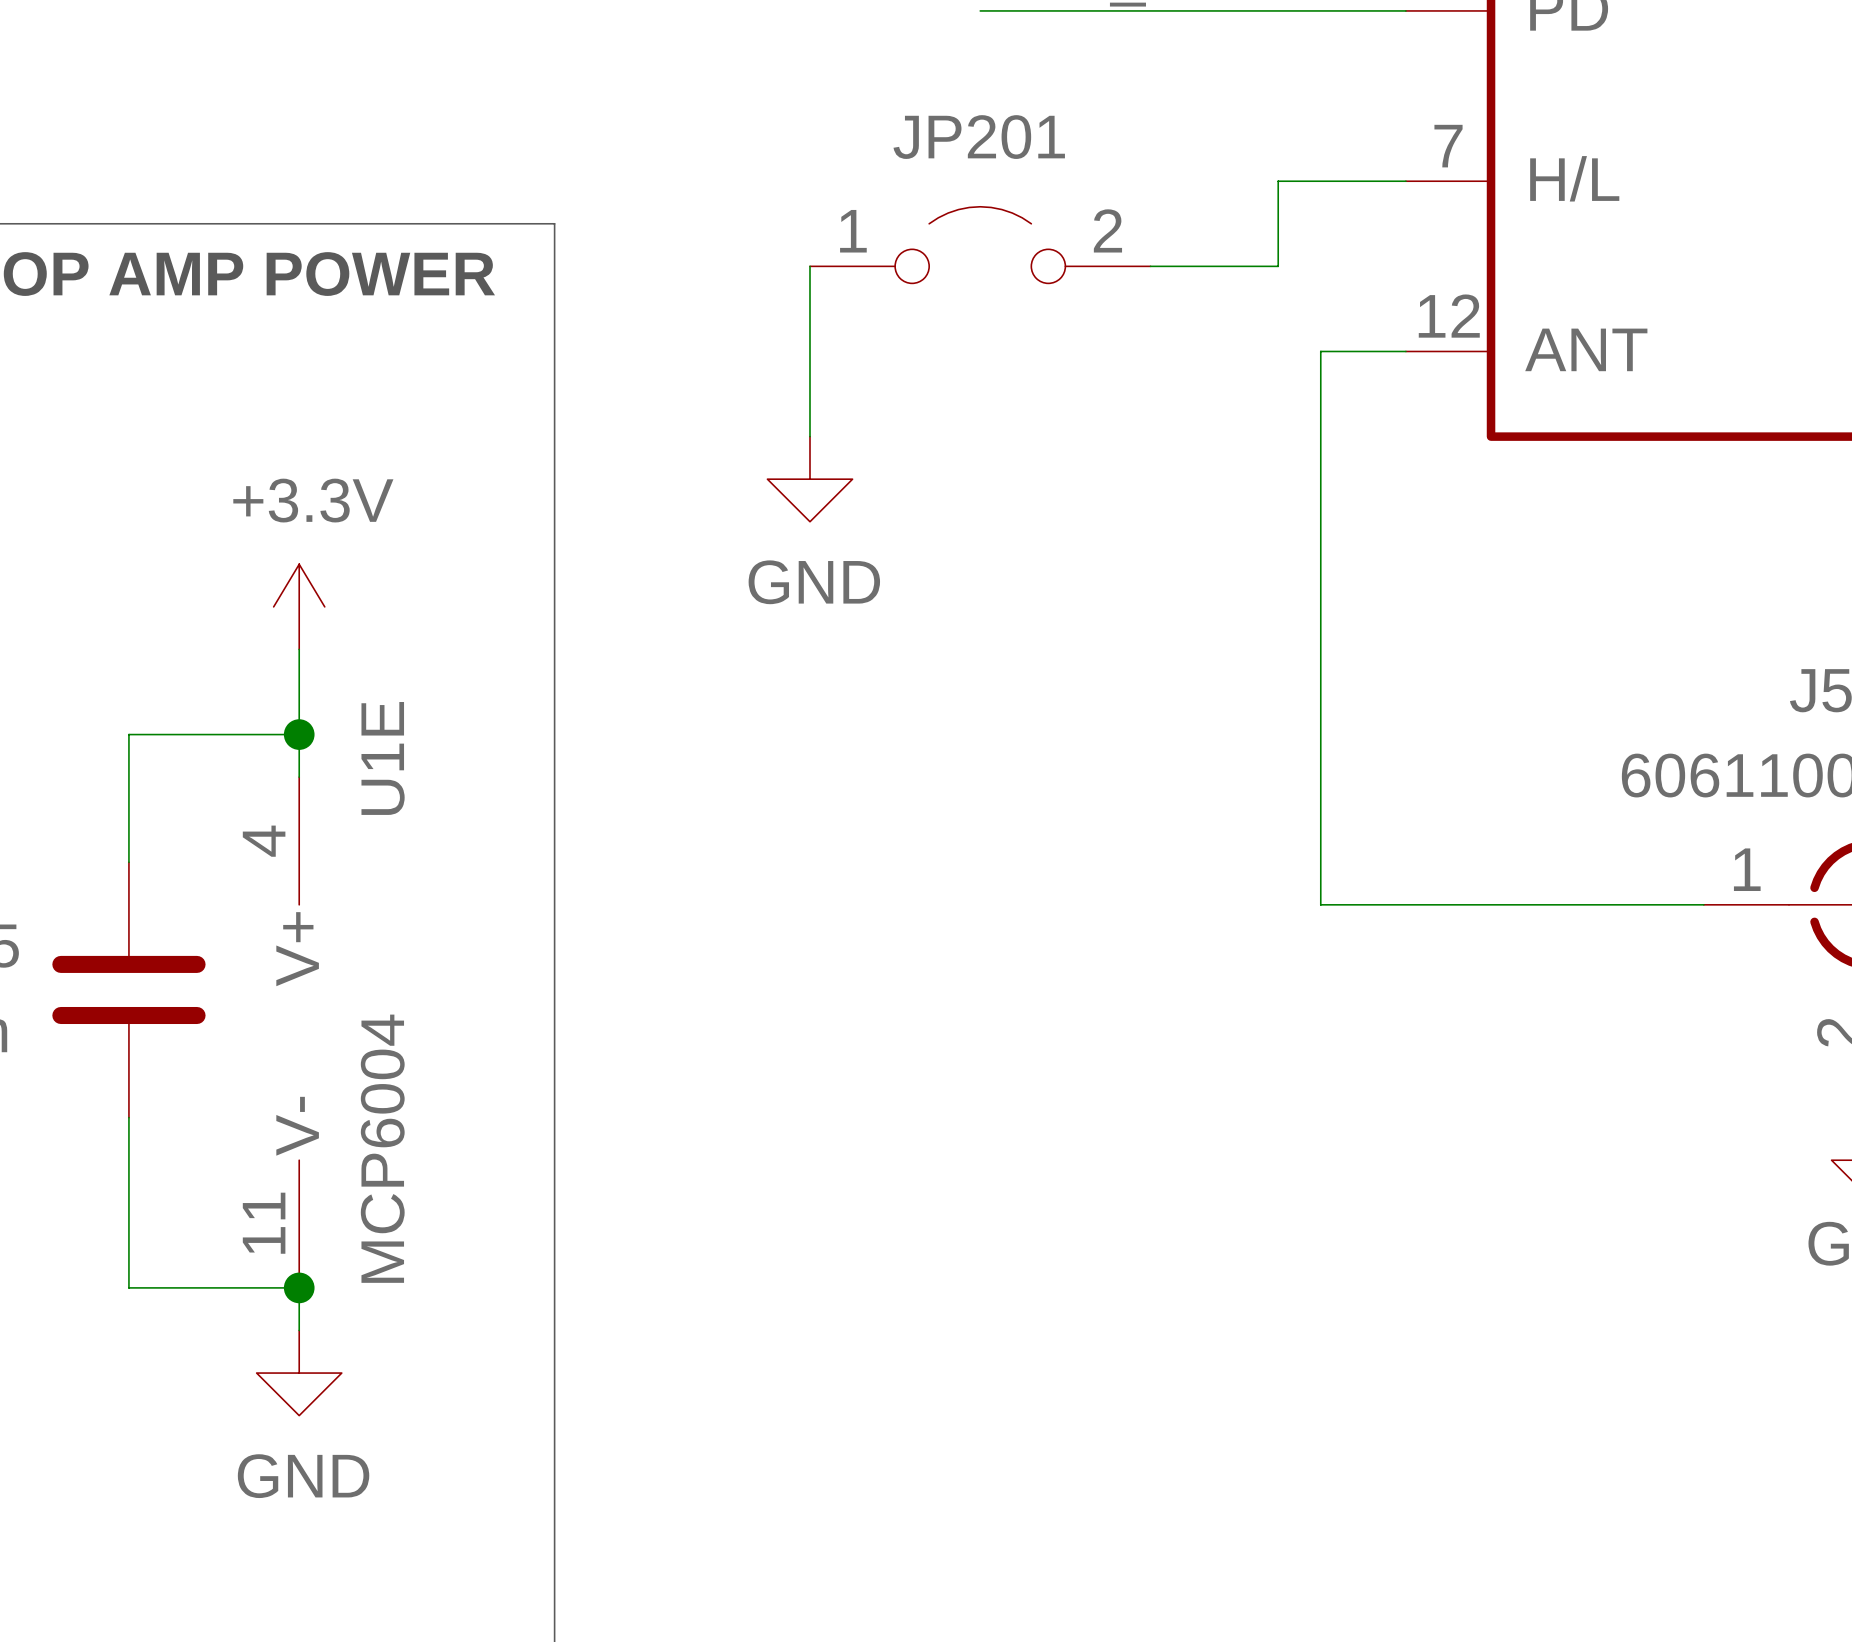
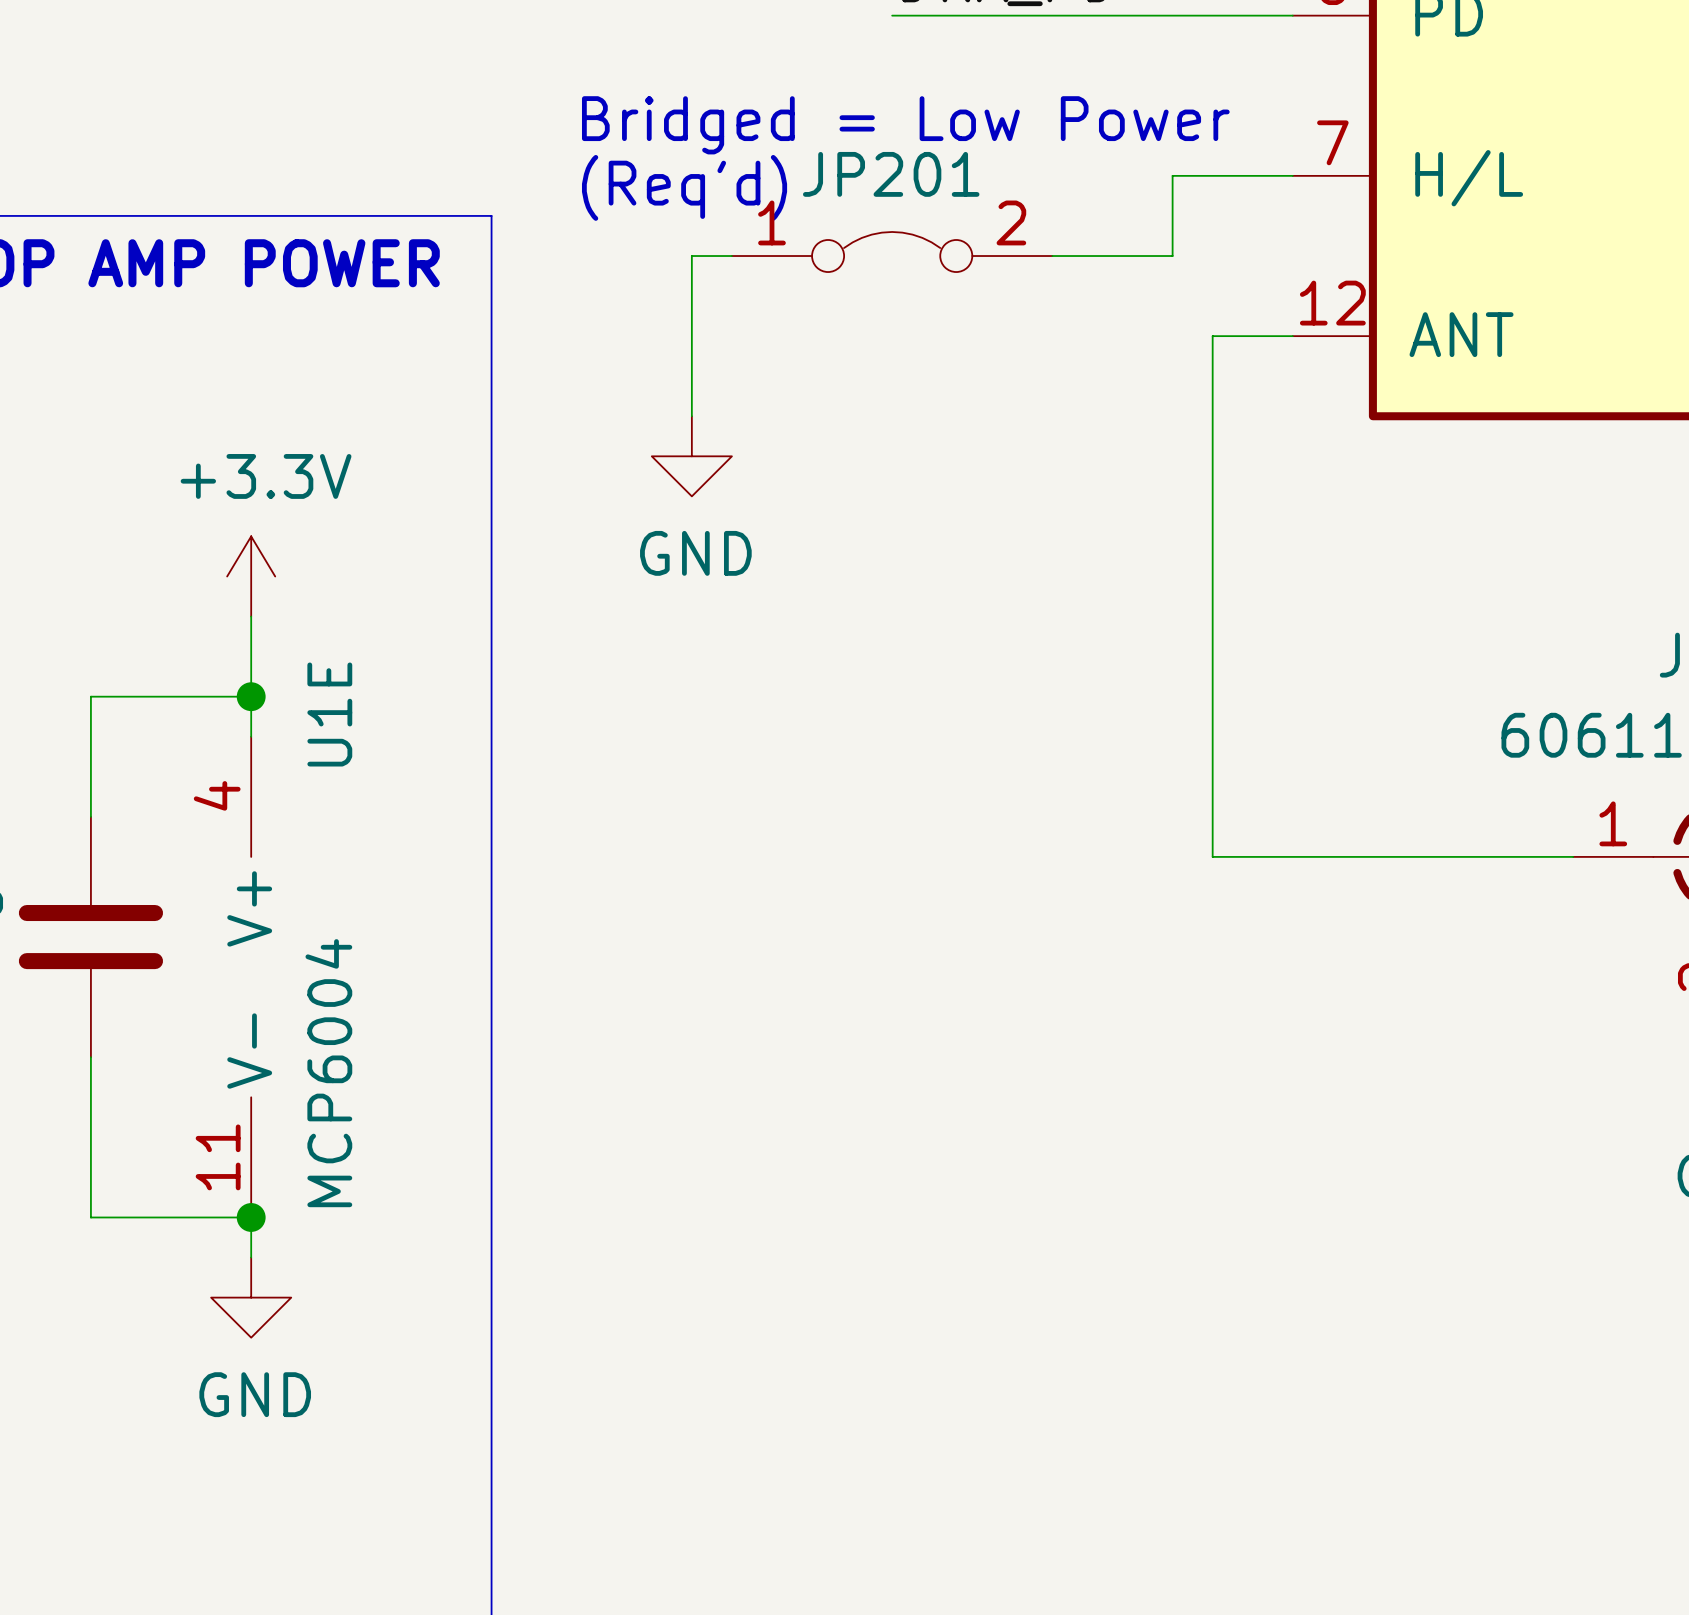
text: none -> Bridged = Low Power (905, 125)
text: none -> (Req'd) (684, 187)
JP201 symbol: [809, 206, 1151, 284] -> [731, 231, 1053, 273]
wire: (809, 266) (809, 436) -> (731, 256) (691, 256) (691, 416)
power symbol position: GND (809, 479) -> GND (691, 456)

